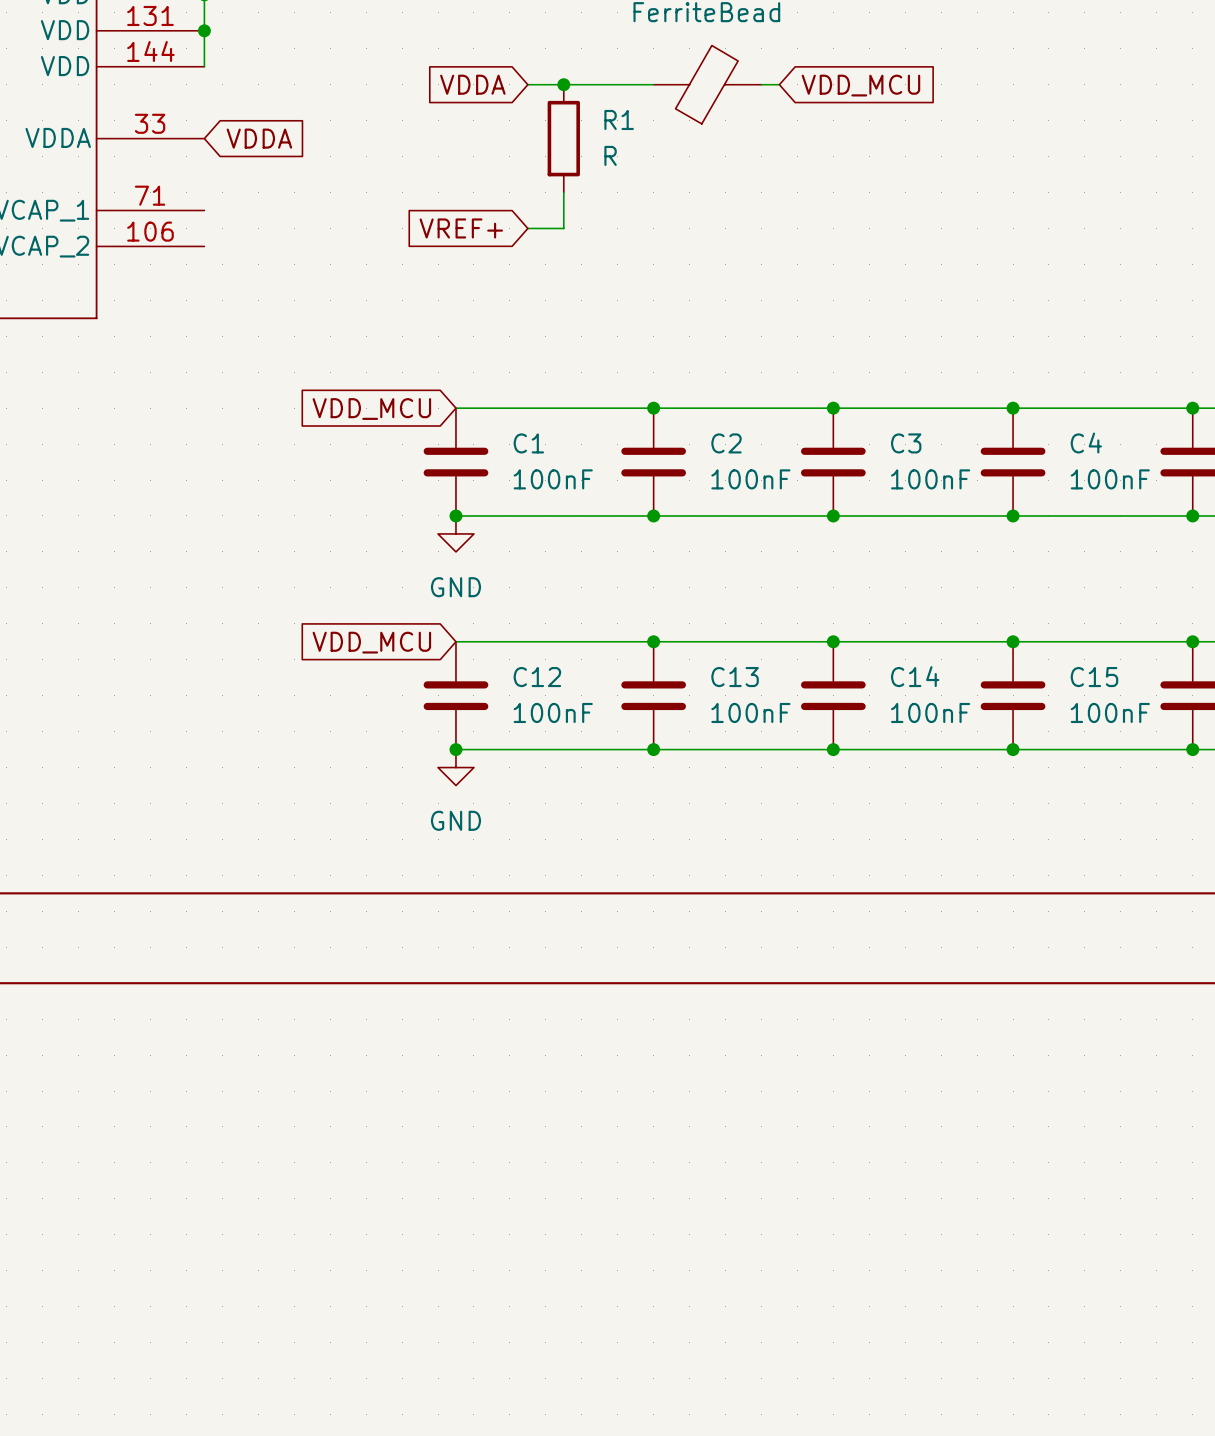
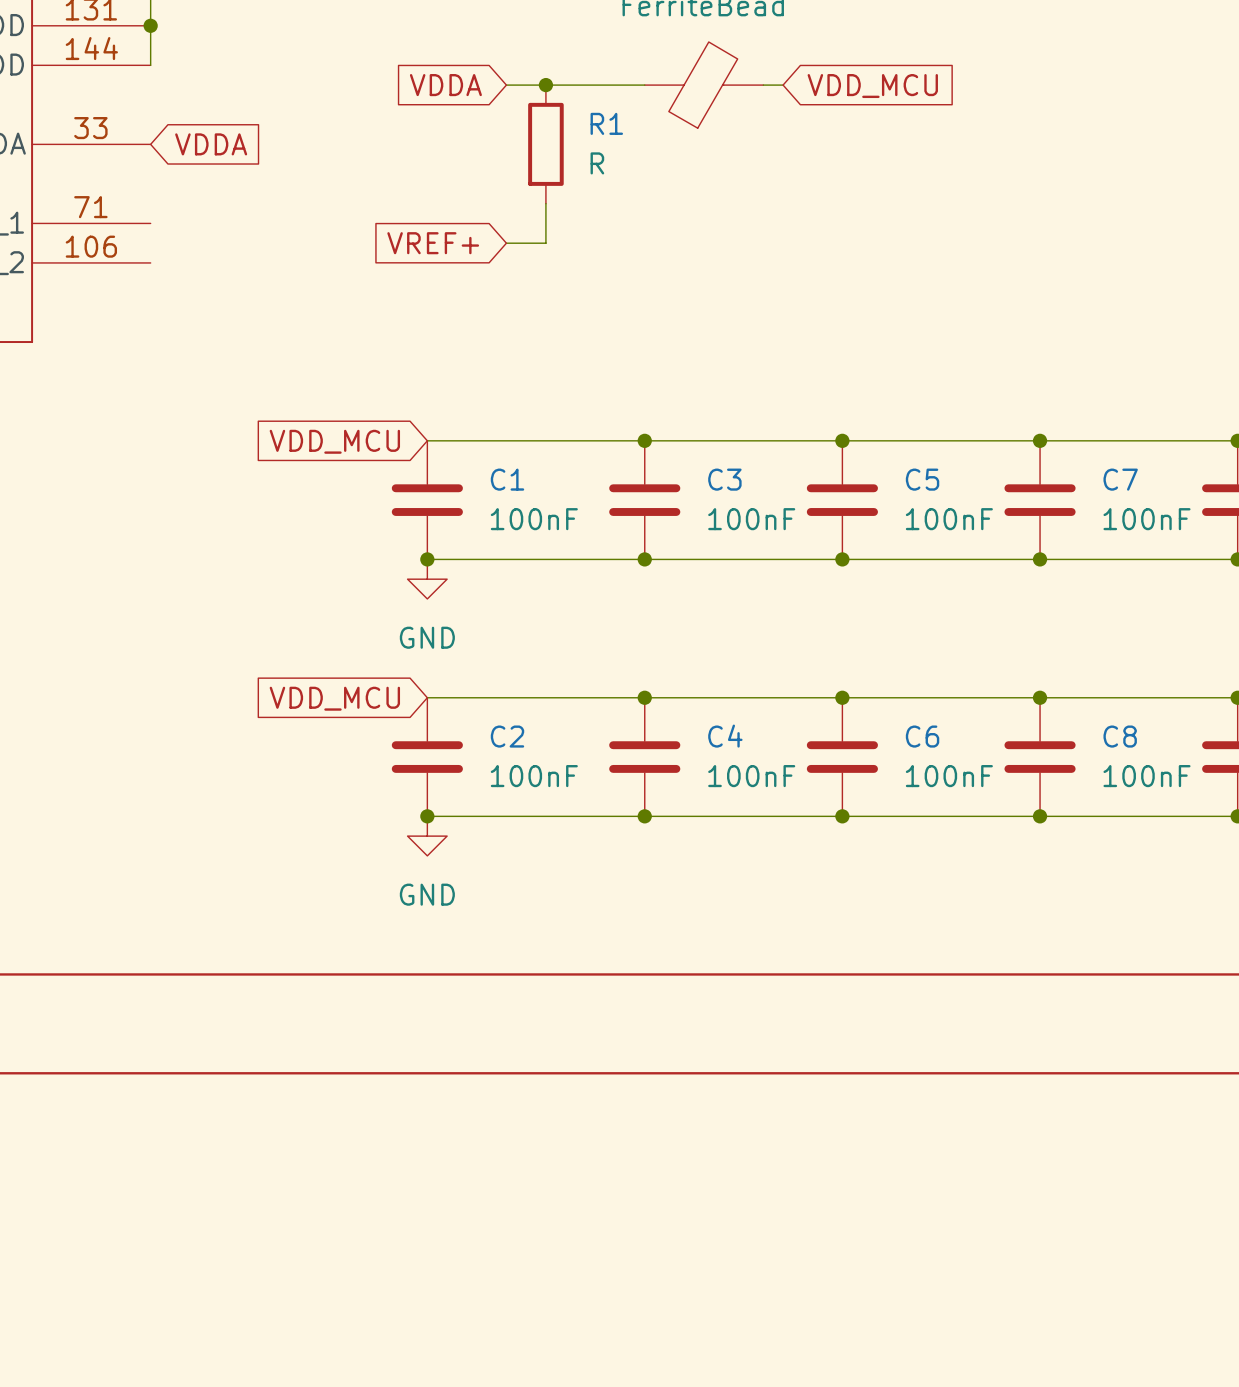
C2 name: C2 (726, 443) -> C3 (724, 479)
C3 name: C3 (906, 443) -> C5 (922, 479)
C4 name: C4 (1086, 443) -> C7 (1120, 479)
C14 name: C14 (915, 676) -> C6 (922, 736)
C12 name: C12 (537, 677) -> C2 (507, 736)
C13 name: C13 (735, 677) -> C4 (725, 736)
C15 name: C15 (1094, 677) -> C8 (1120, 736)

